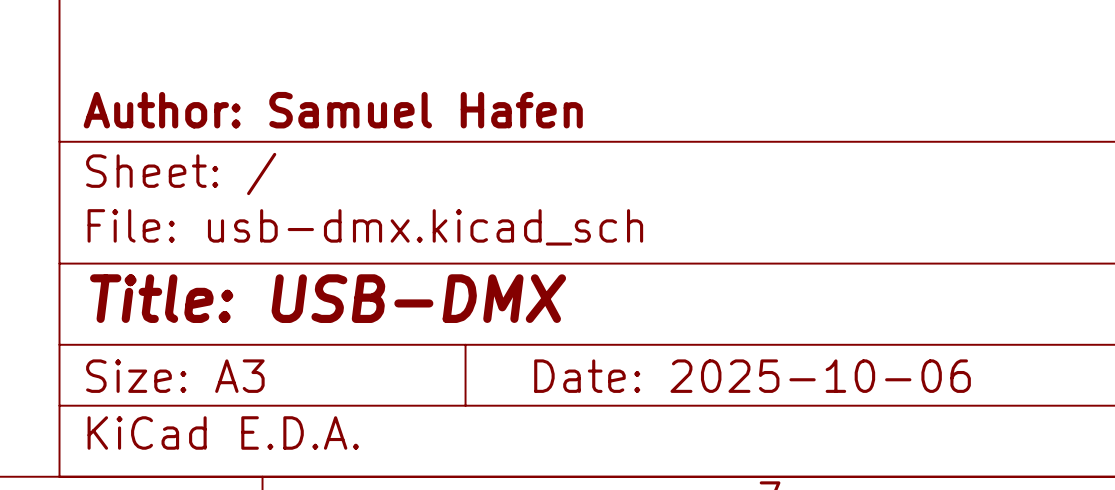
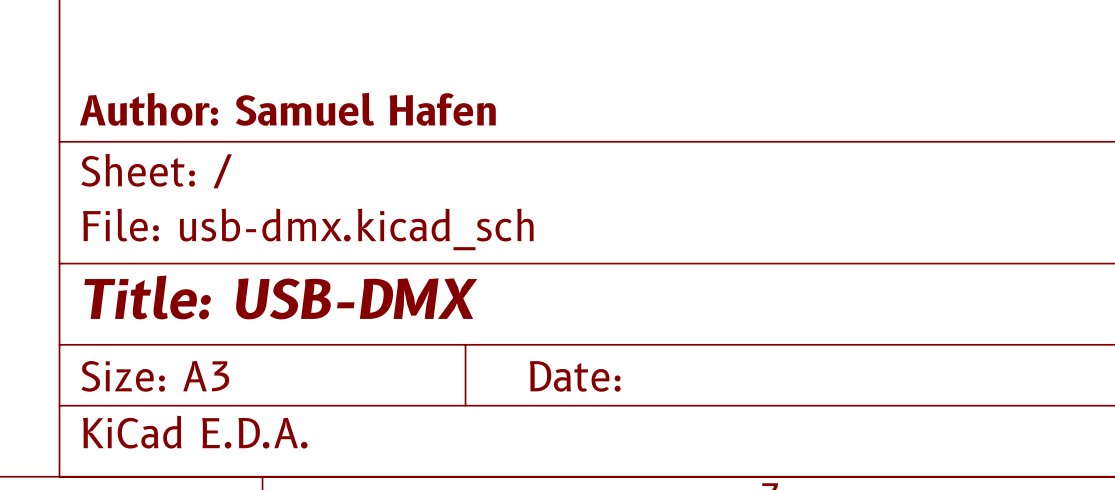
title block: Date: 2025-10-06 (752, 376) -> Date: (575, 376)

